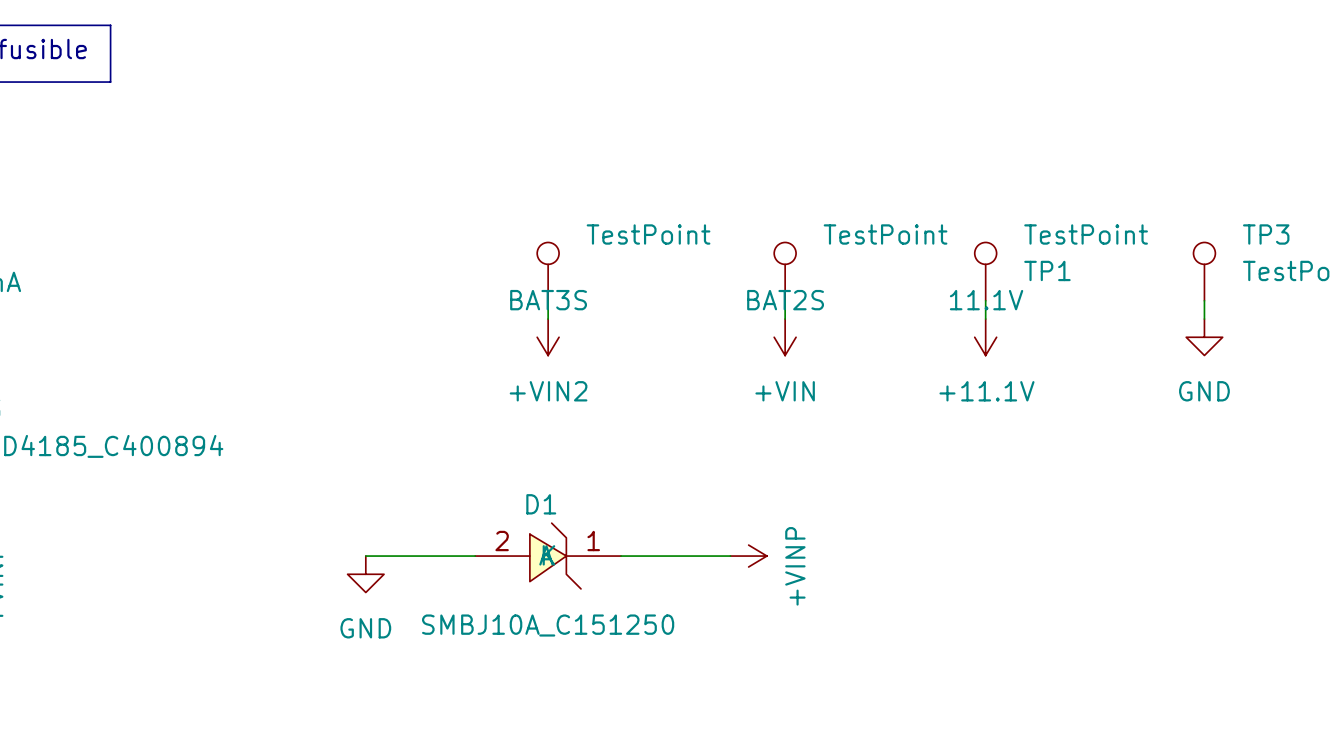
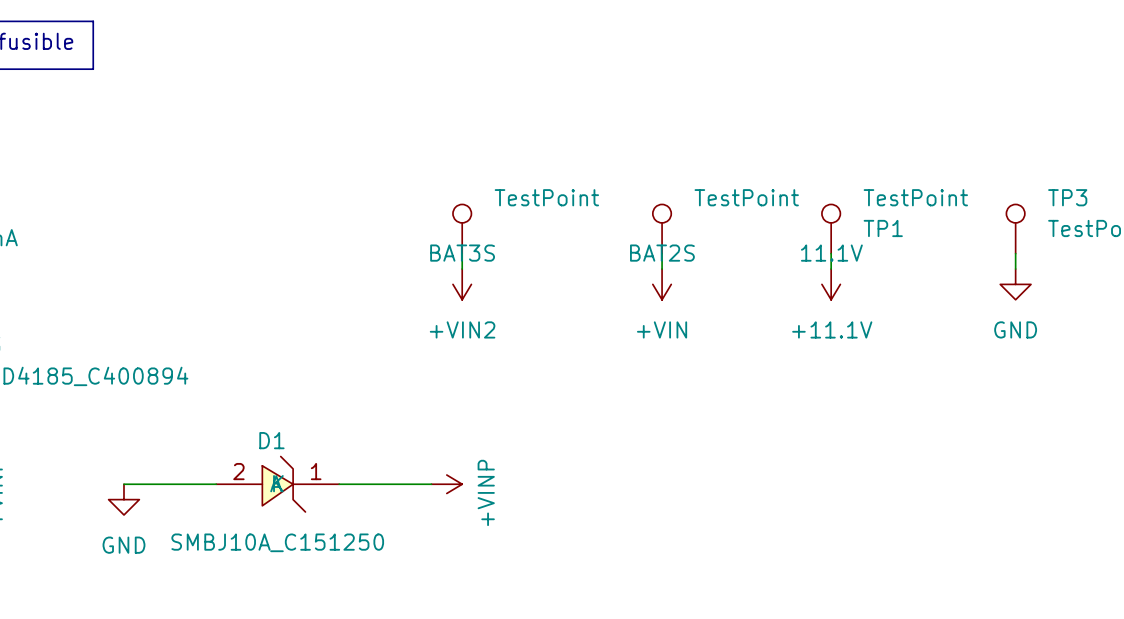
wire: (365, 556) (475, 556) -> (339, 484) (431, 484)
D1 position: (548, 556) -> (277, 484)
wire: (621, 556) (730, 556) -> none
power symbol position: +VINP (748, 556) -> +VINP (446, 484)
wire: none -> (123, 484) (216, 484)
power symbol position: GND (365, 574) -> GND (123, 499)

